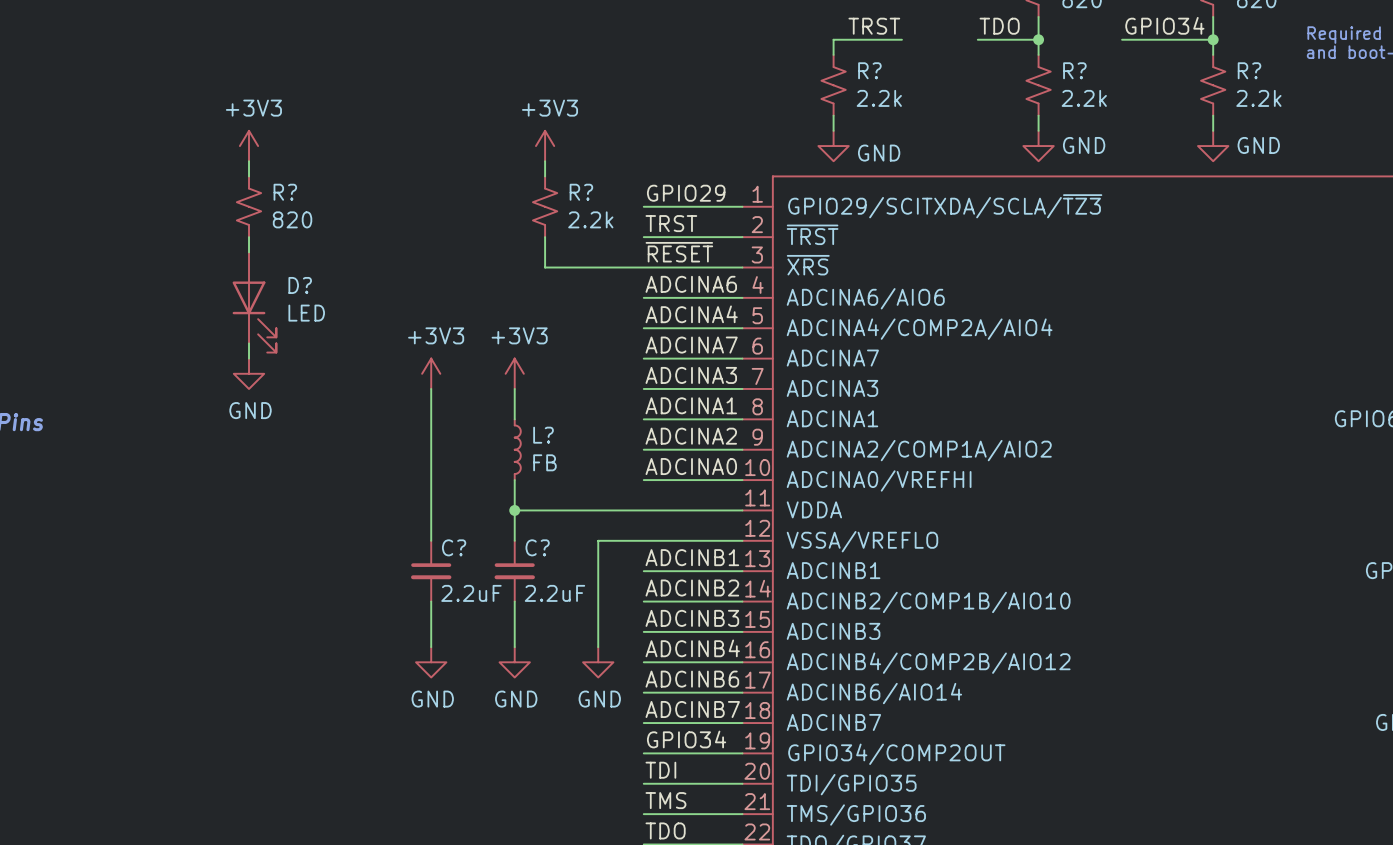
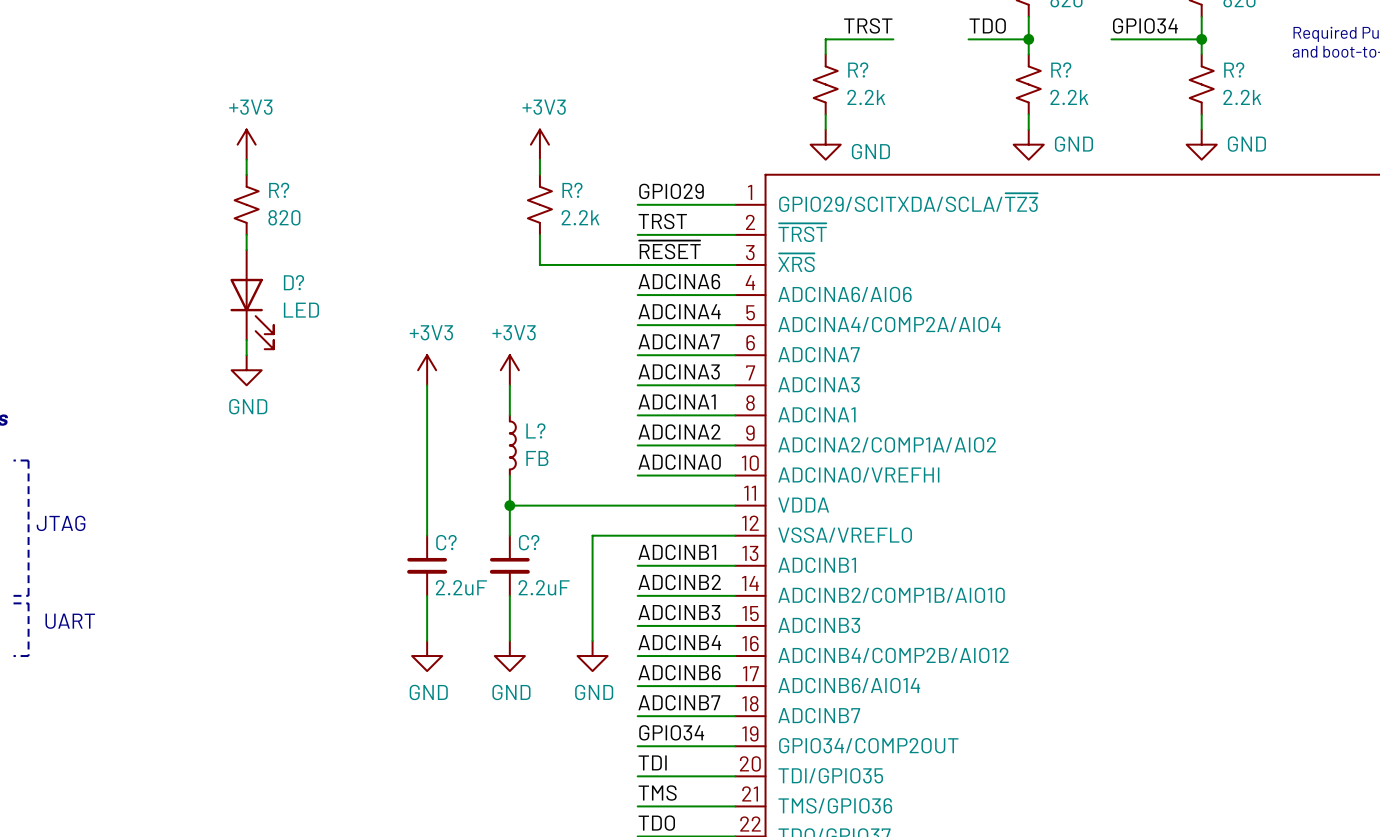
line: none -> (13, 460) (28, 460) (28, 595) (13, 595)
text: none -> JTAG (61, 523)
line: none -> (13, 603) (28, 603) (28, 656) (13, 656)
text: none -> UART (70, 621)

